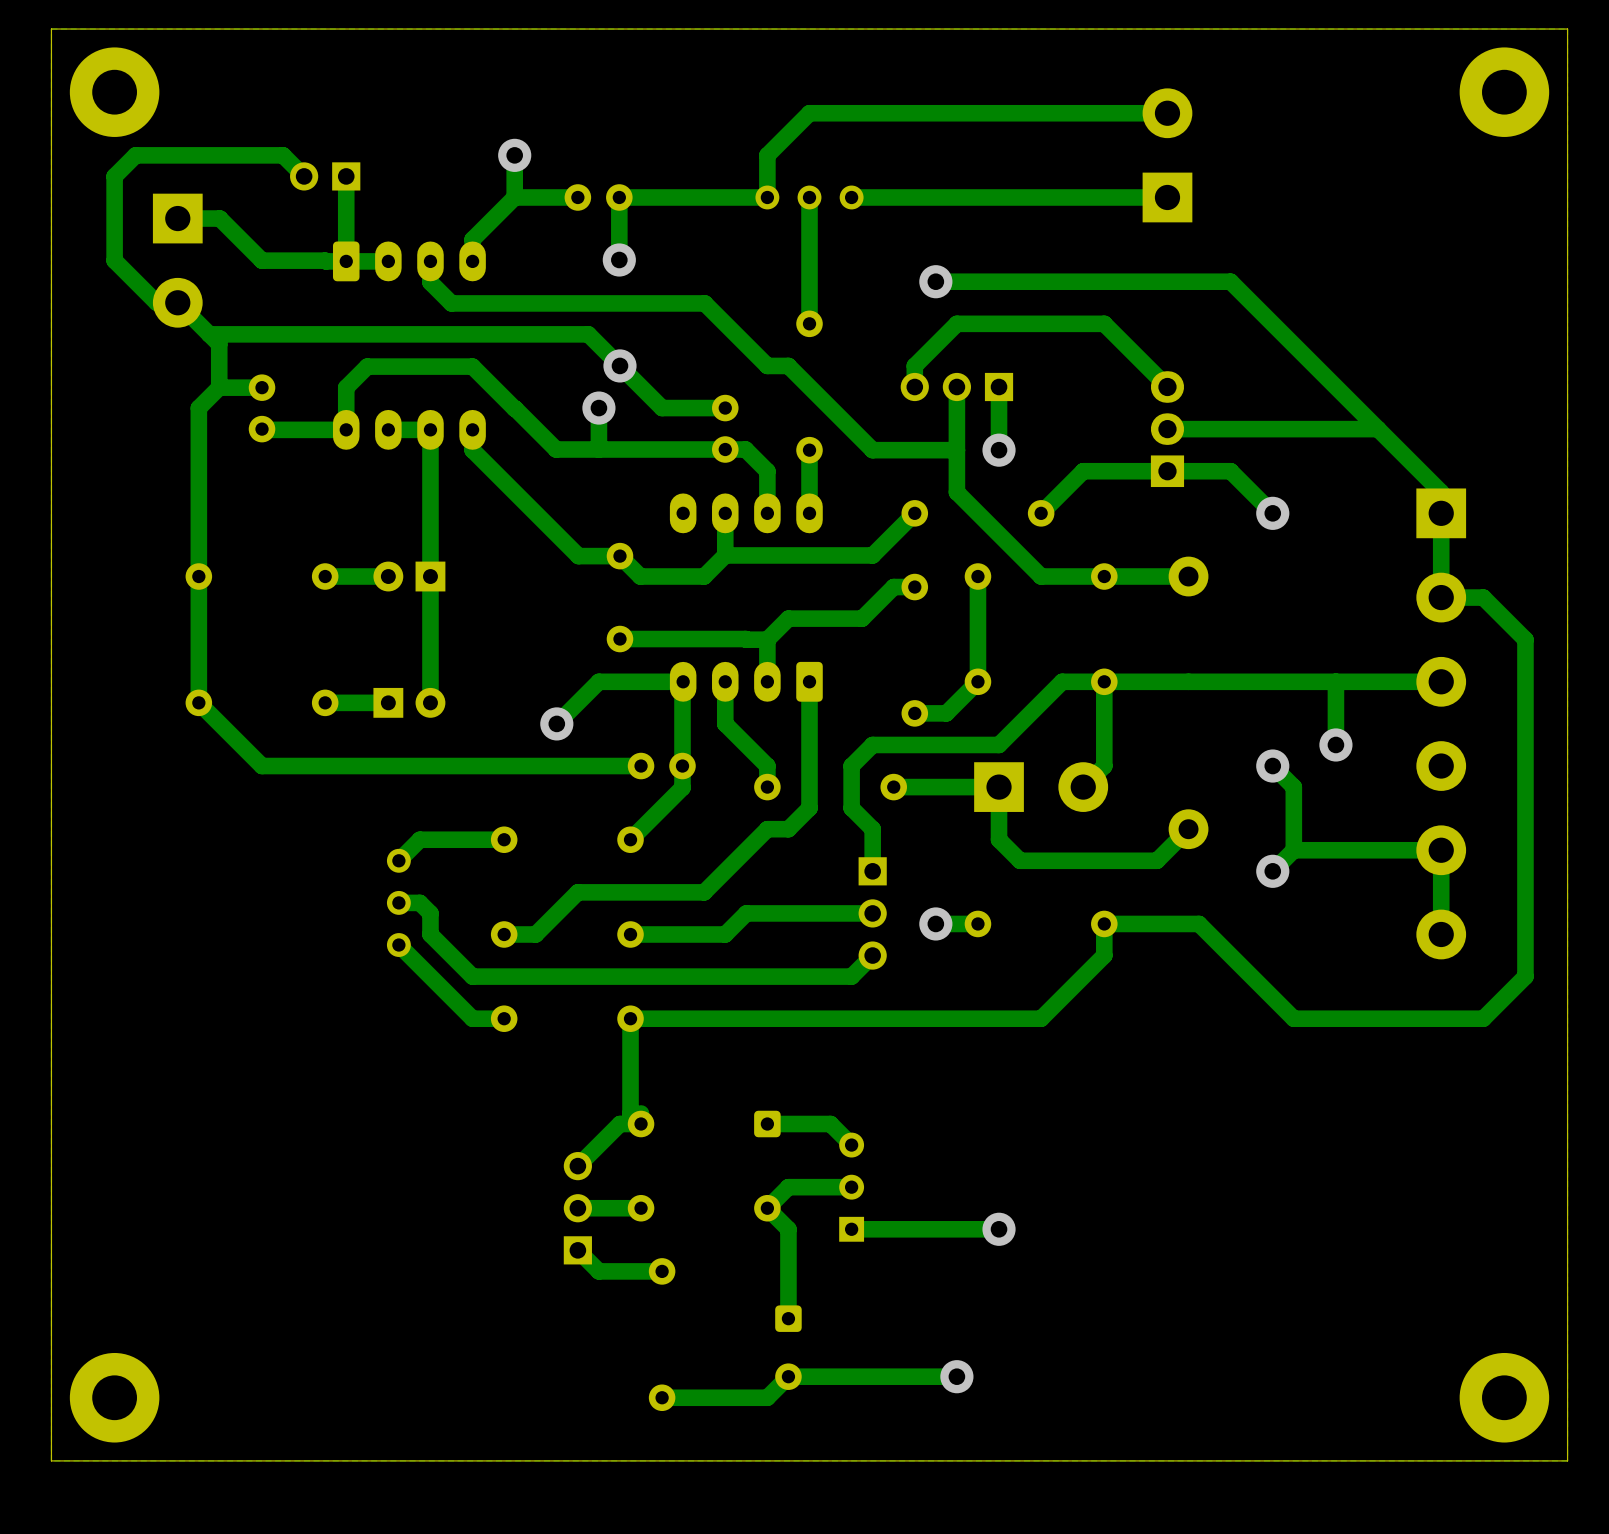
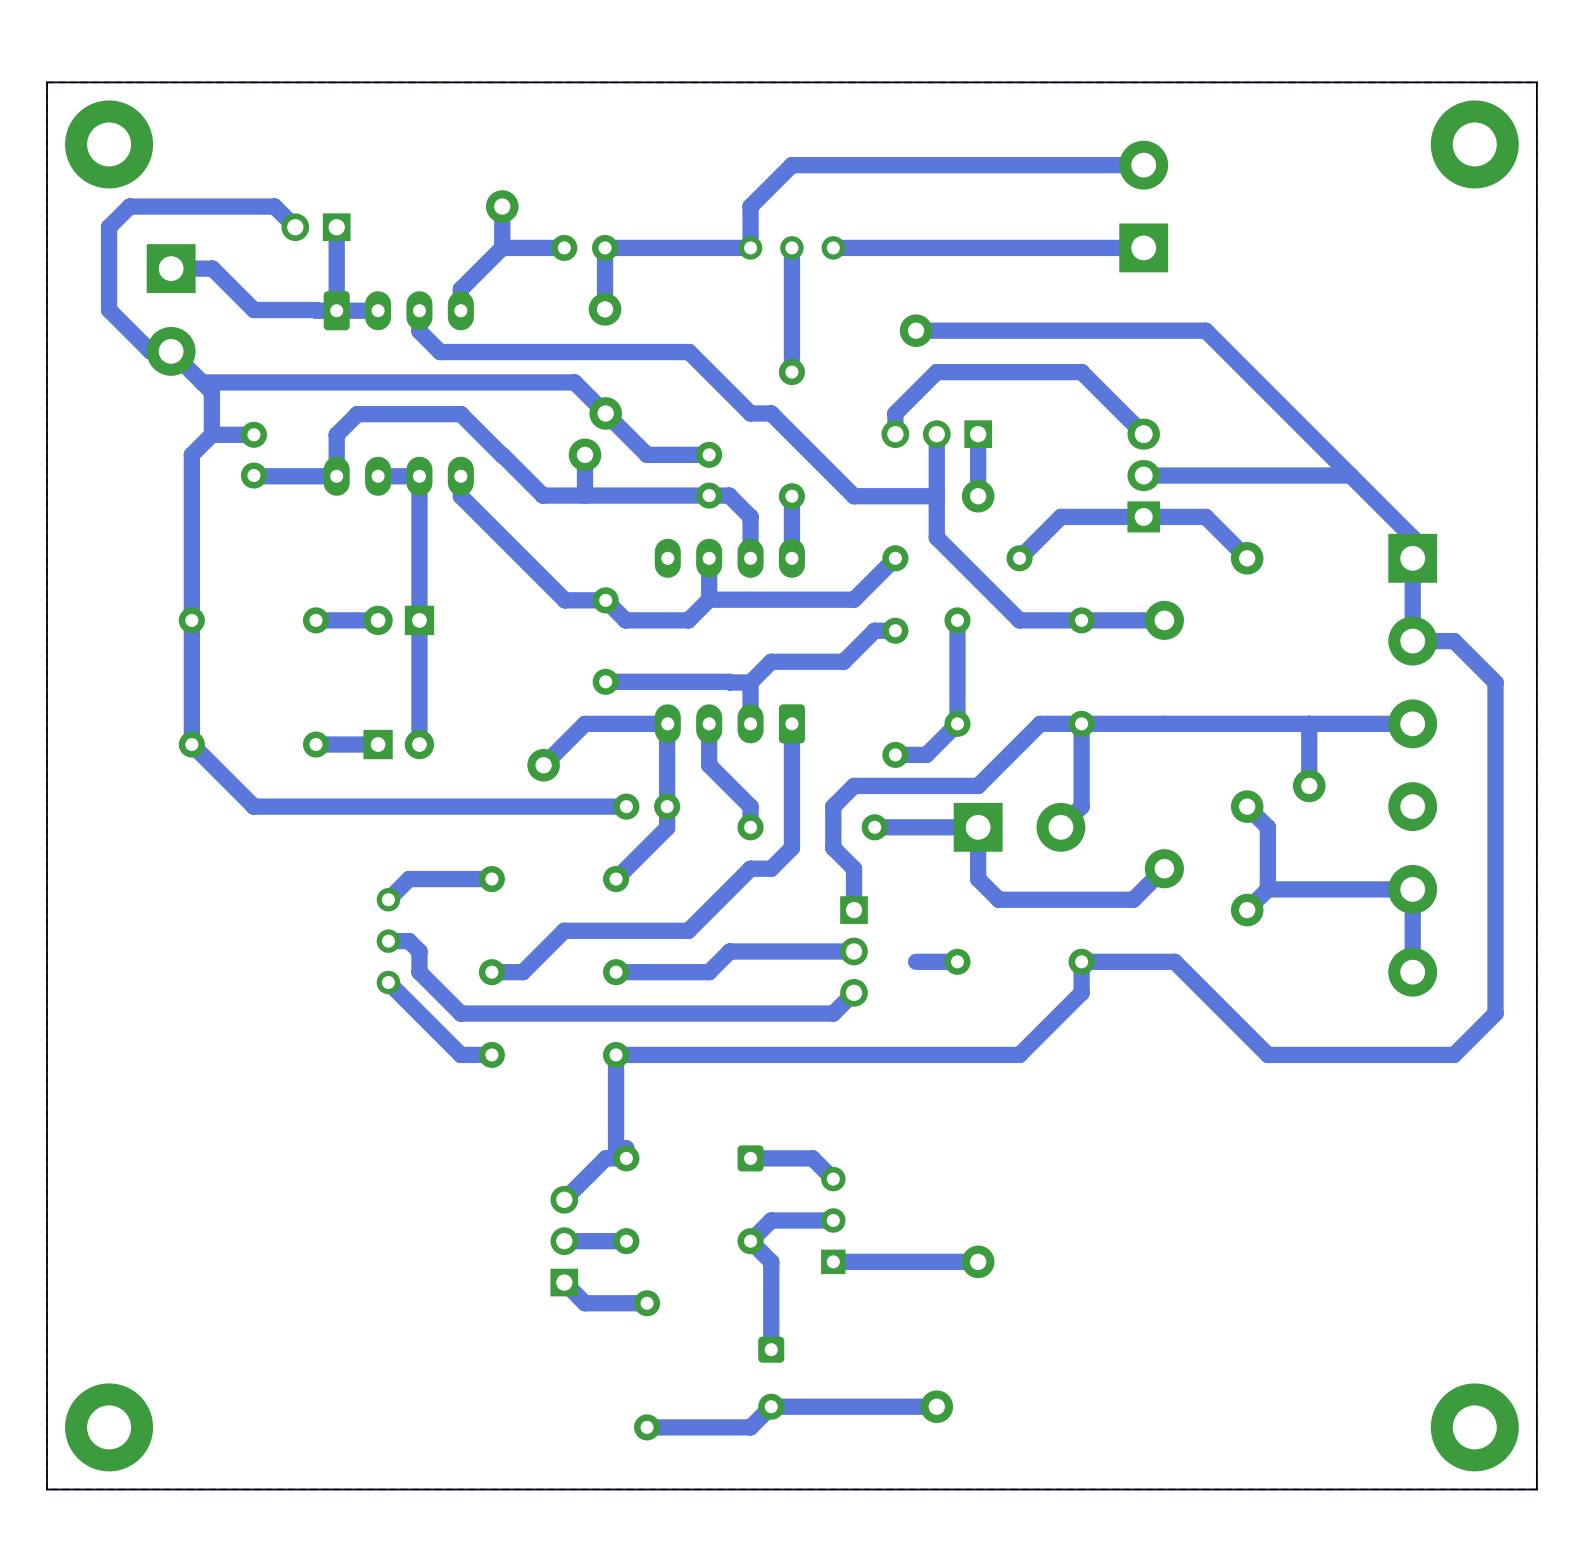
via: (935, 923) -> none

